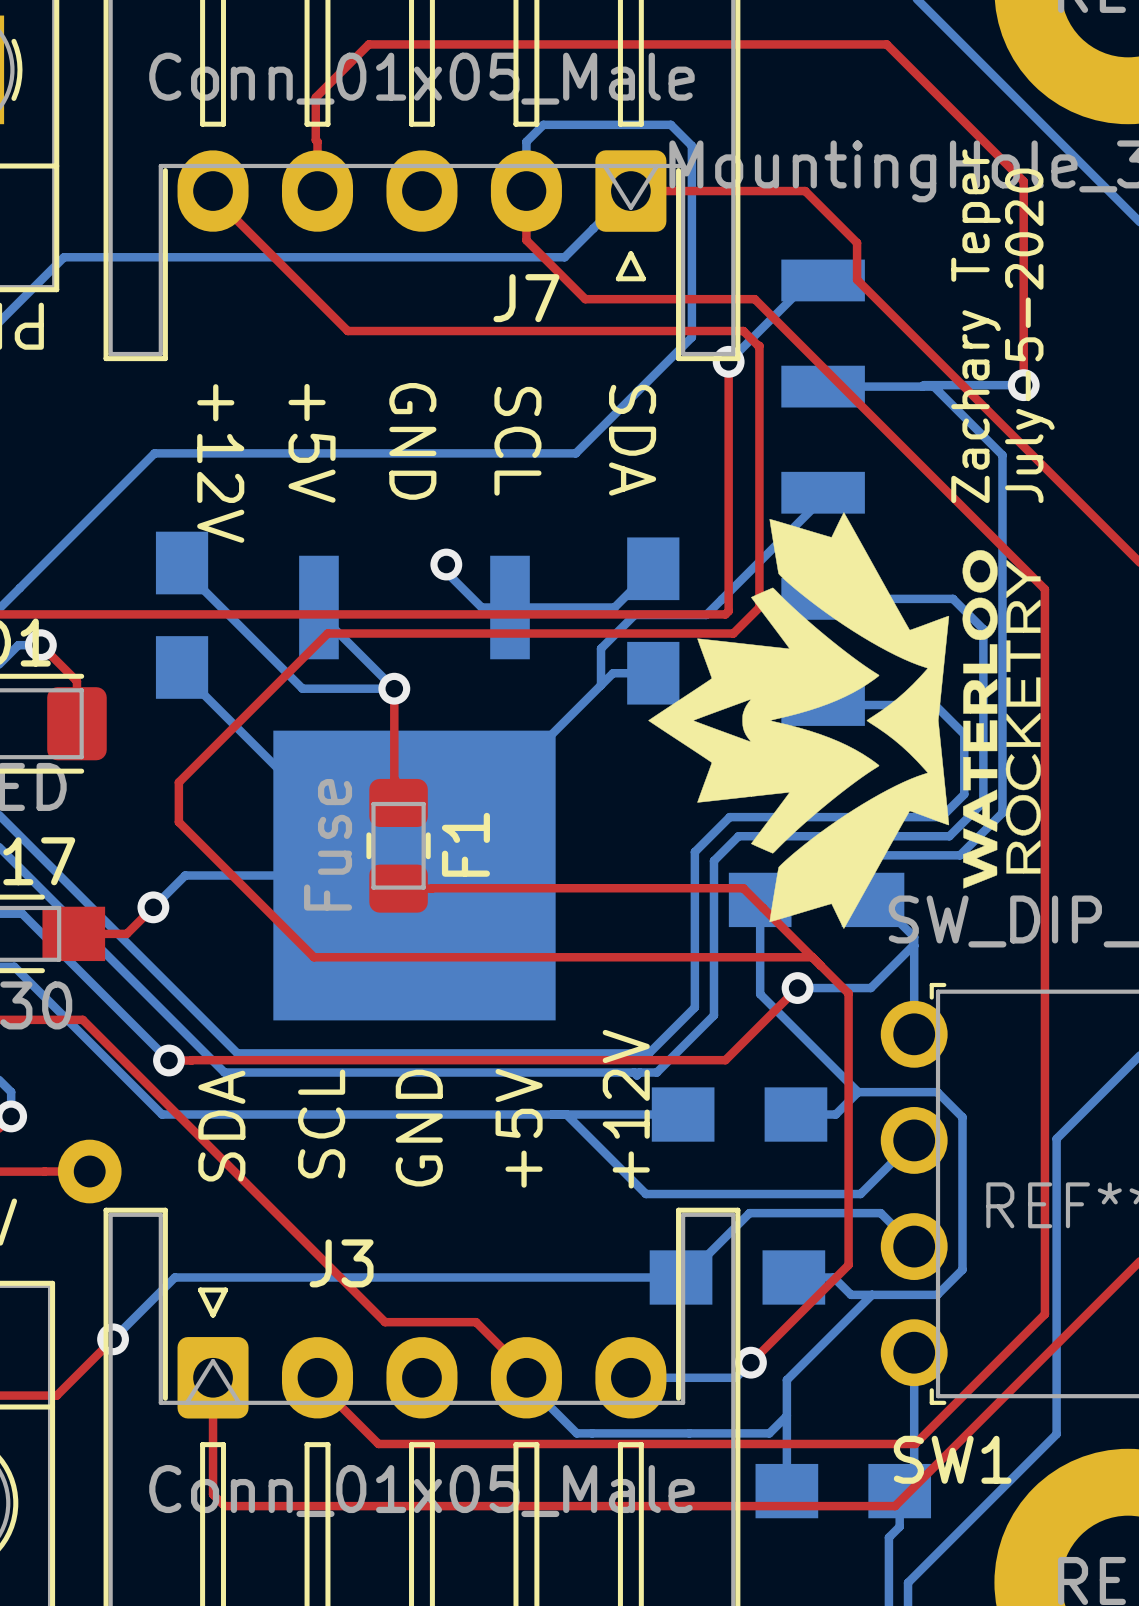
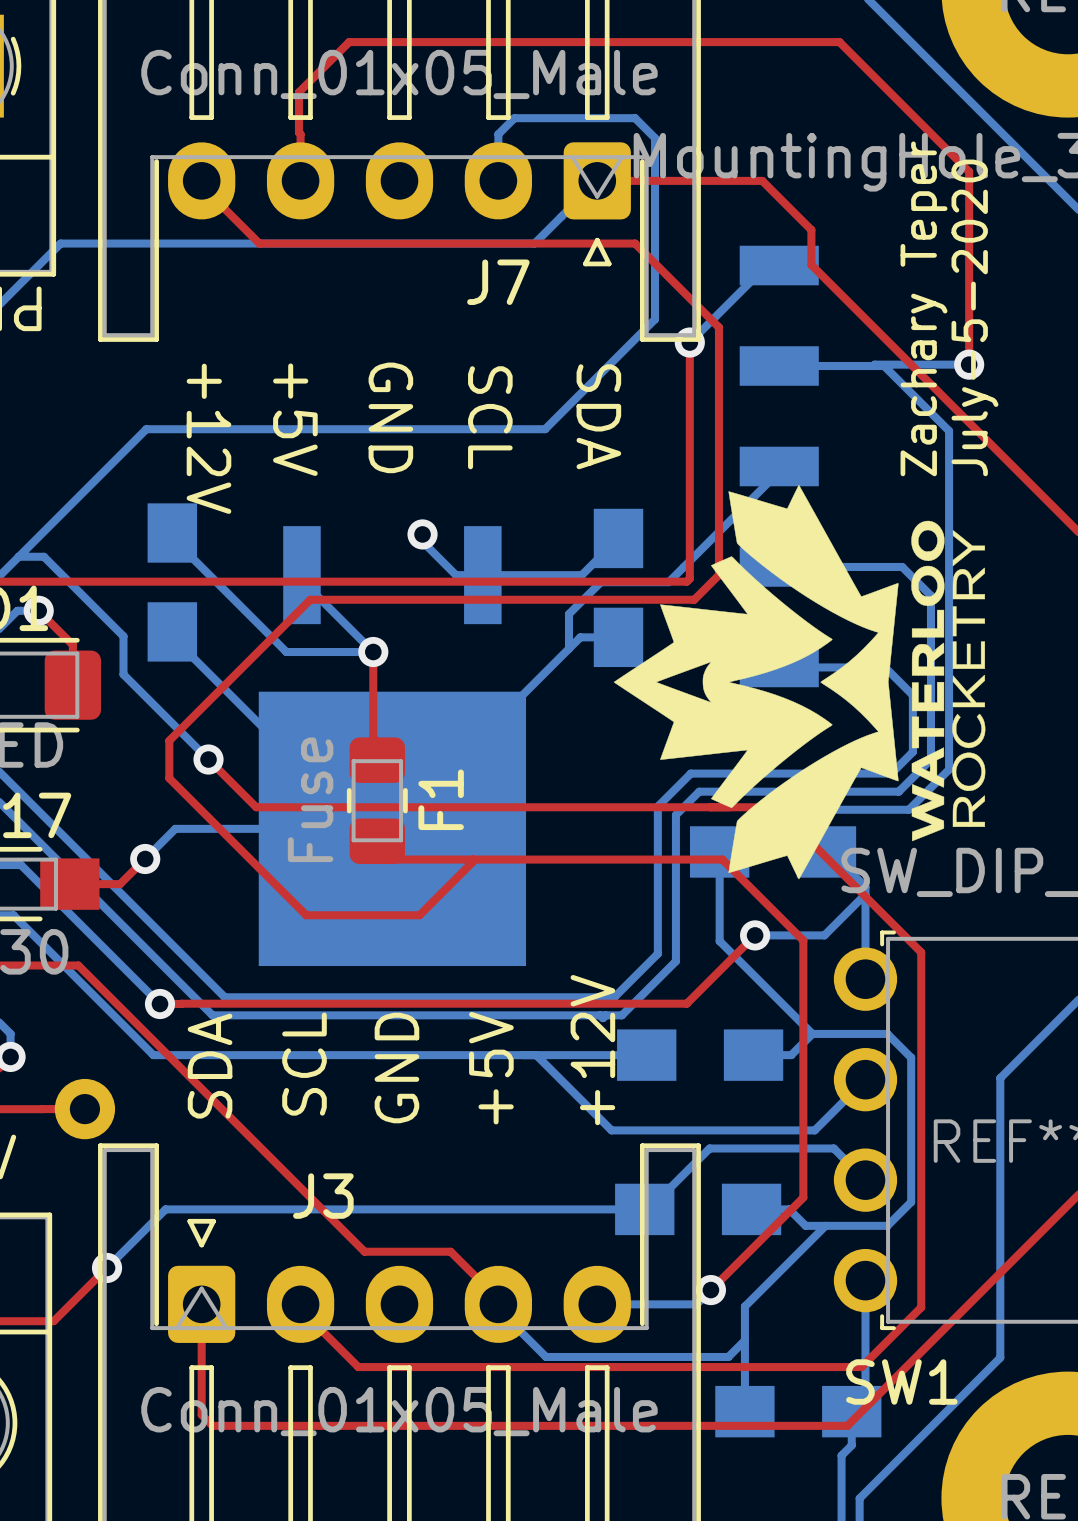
top track: (526, 191) (526, 240) (585, 299) (754, 299) (1044, 589) (1044, 1314) (915, 1443) (910, 1443) -> (208, 759) (256, 807) (776, 807) (921, 952) (921, 1307) (861, 1367)
top track: (274, 257) (347, 331) (743, 331) (759, 345) -> (259, 243) (635, 243) (718, 327)
bottom track: none -> (18, 556) (43, 556) (123, 636) (123, 674) (208, 759)
via: none -> (208, 759)
top track: (432, 888) (743, 888) (763, 907) -> (377, 859) (722, 859)
top track: (313, 957) (812, 957) -> (297, 906) (306, 915) (419, 915) (473, 859)

